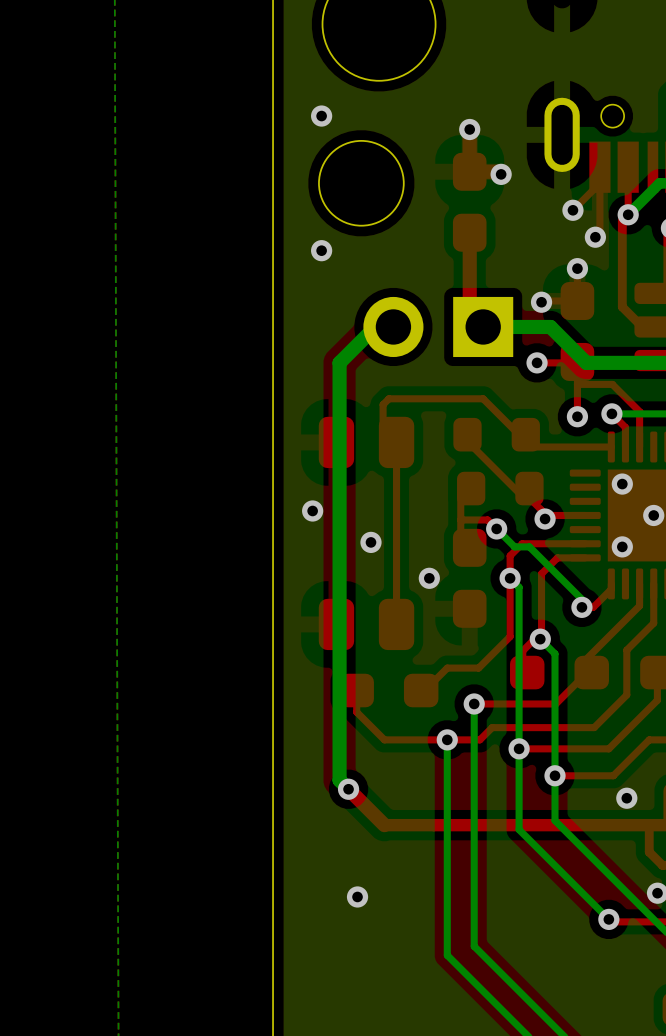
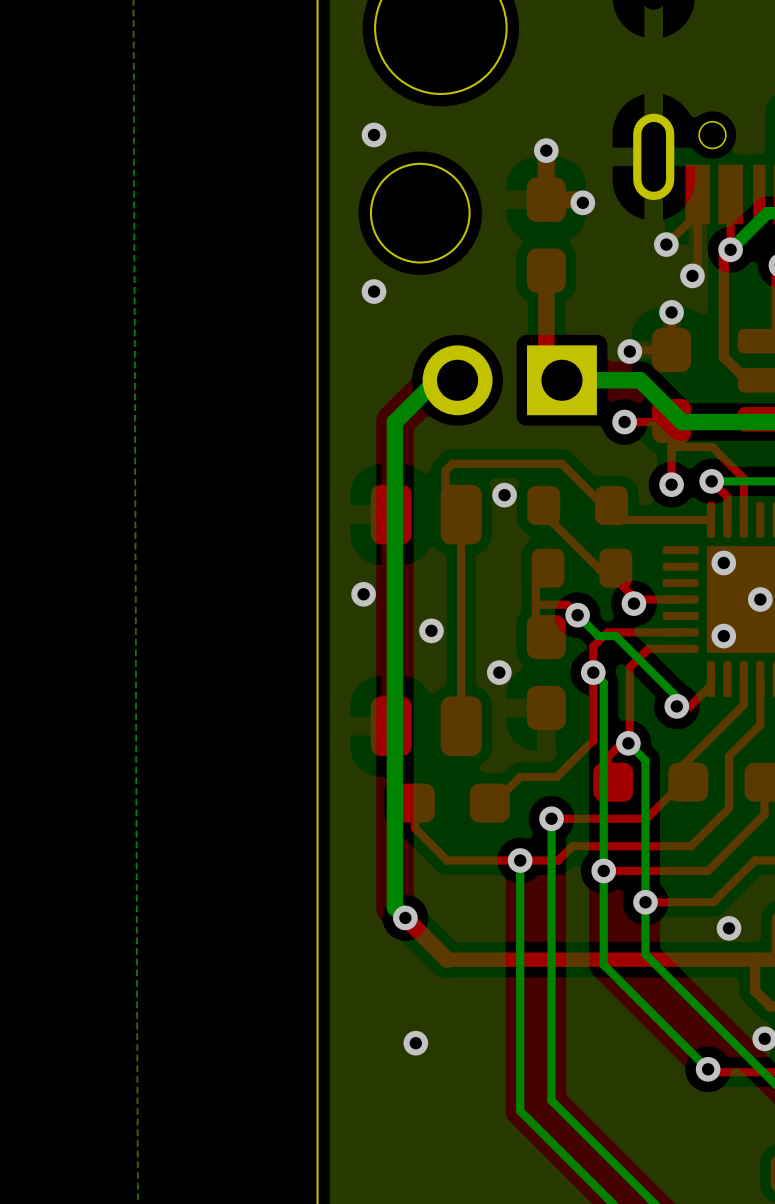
via: none -> (504, 495)

